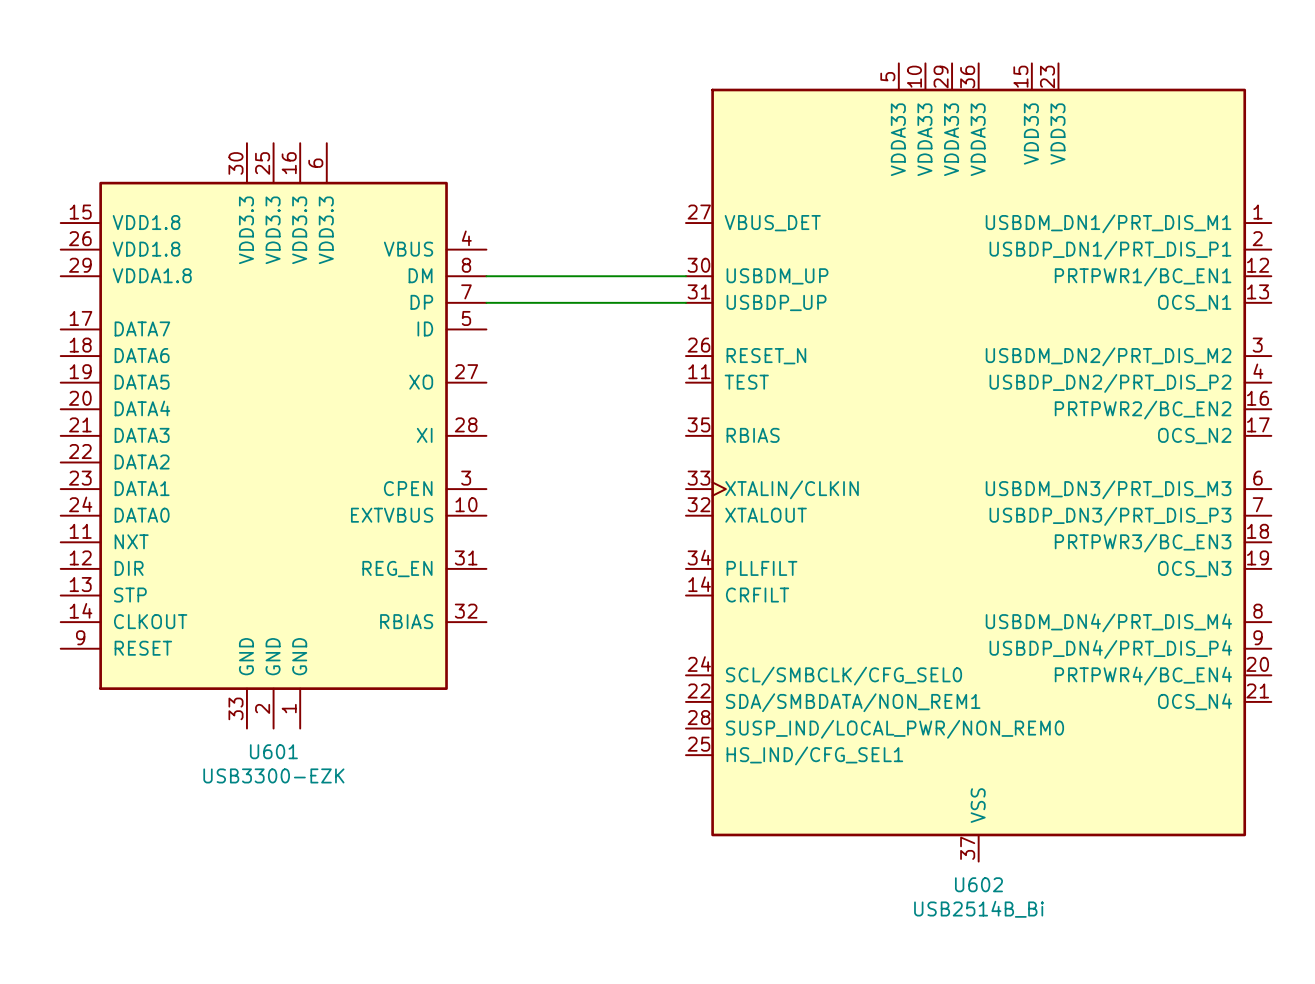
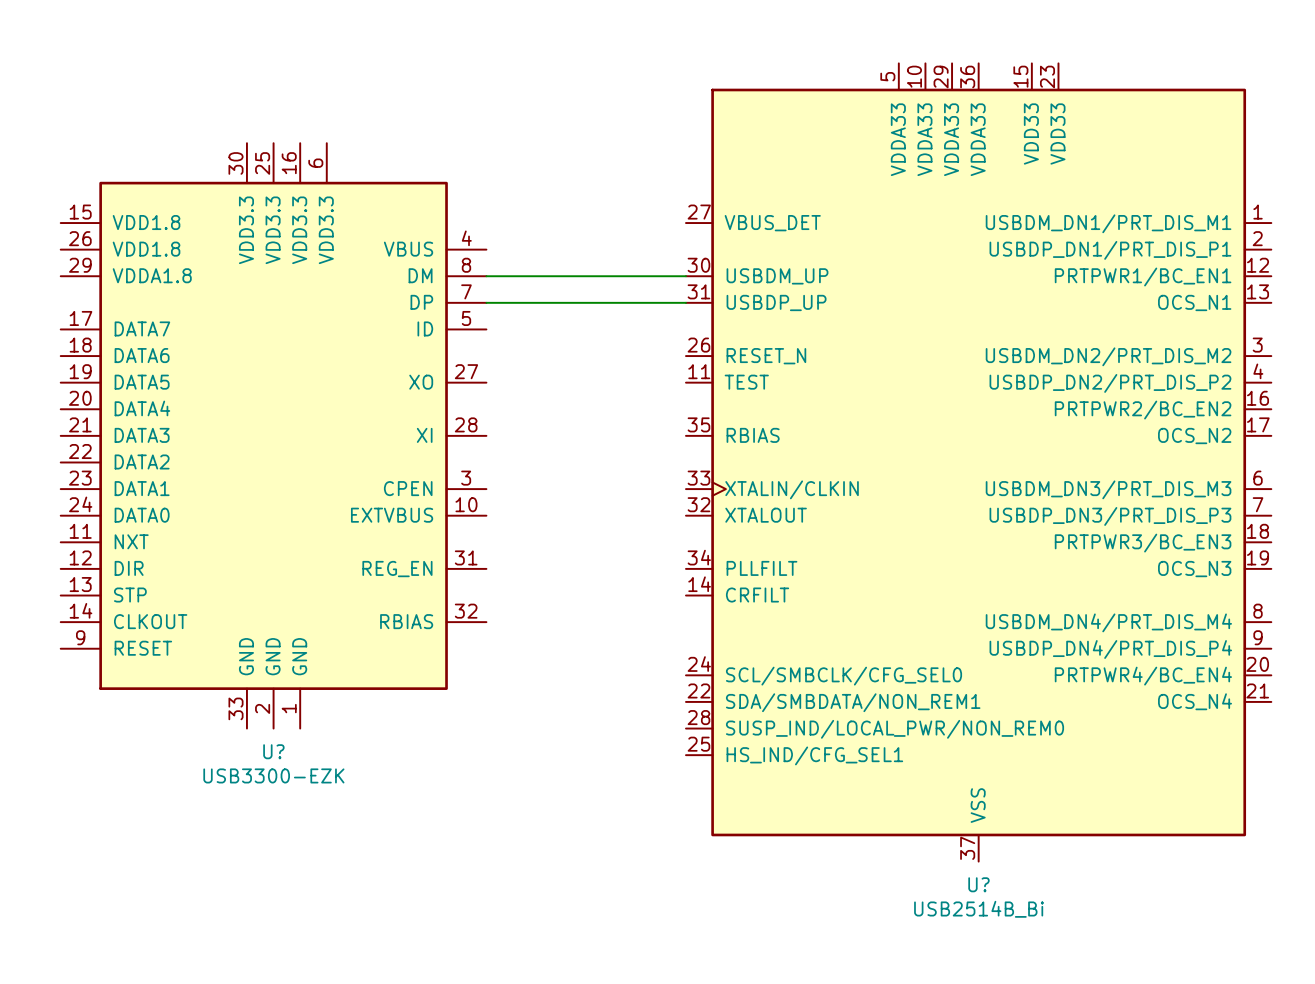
U601 name: U601 (273, 751) -> U? (273, 751)
U602 name: U602 (978, 884) -> U? (978, 884)

